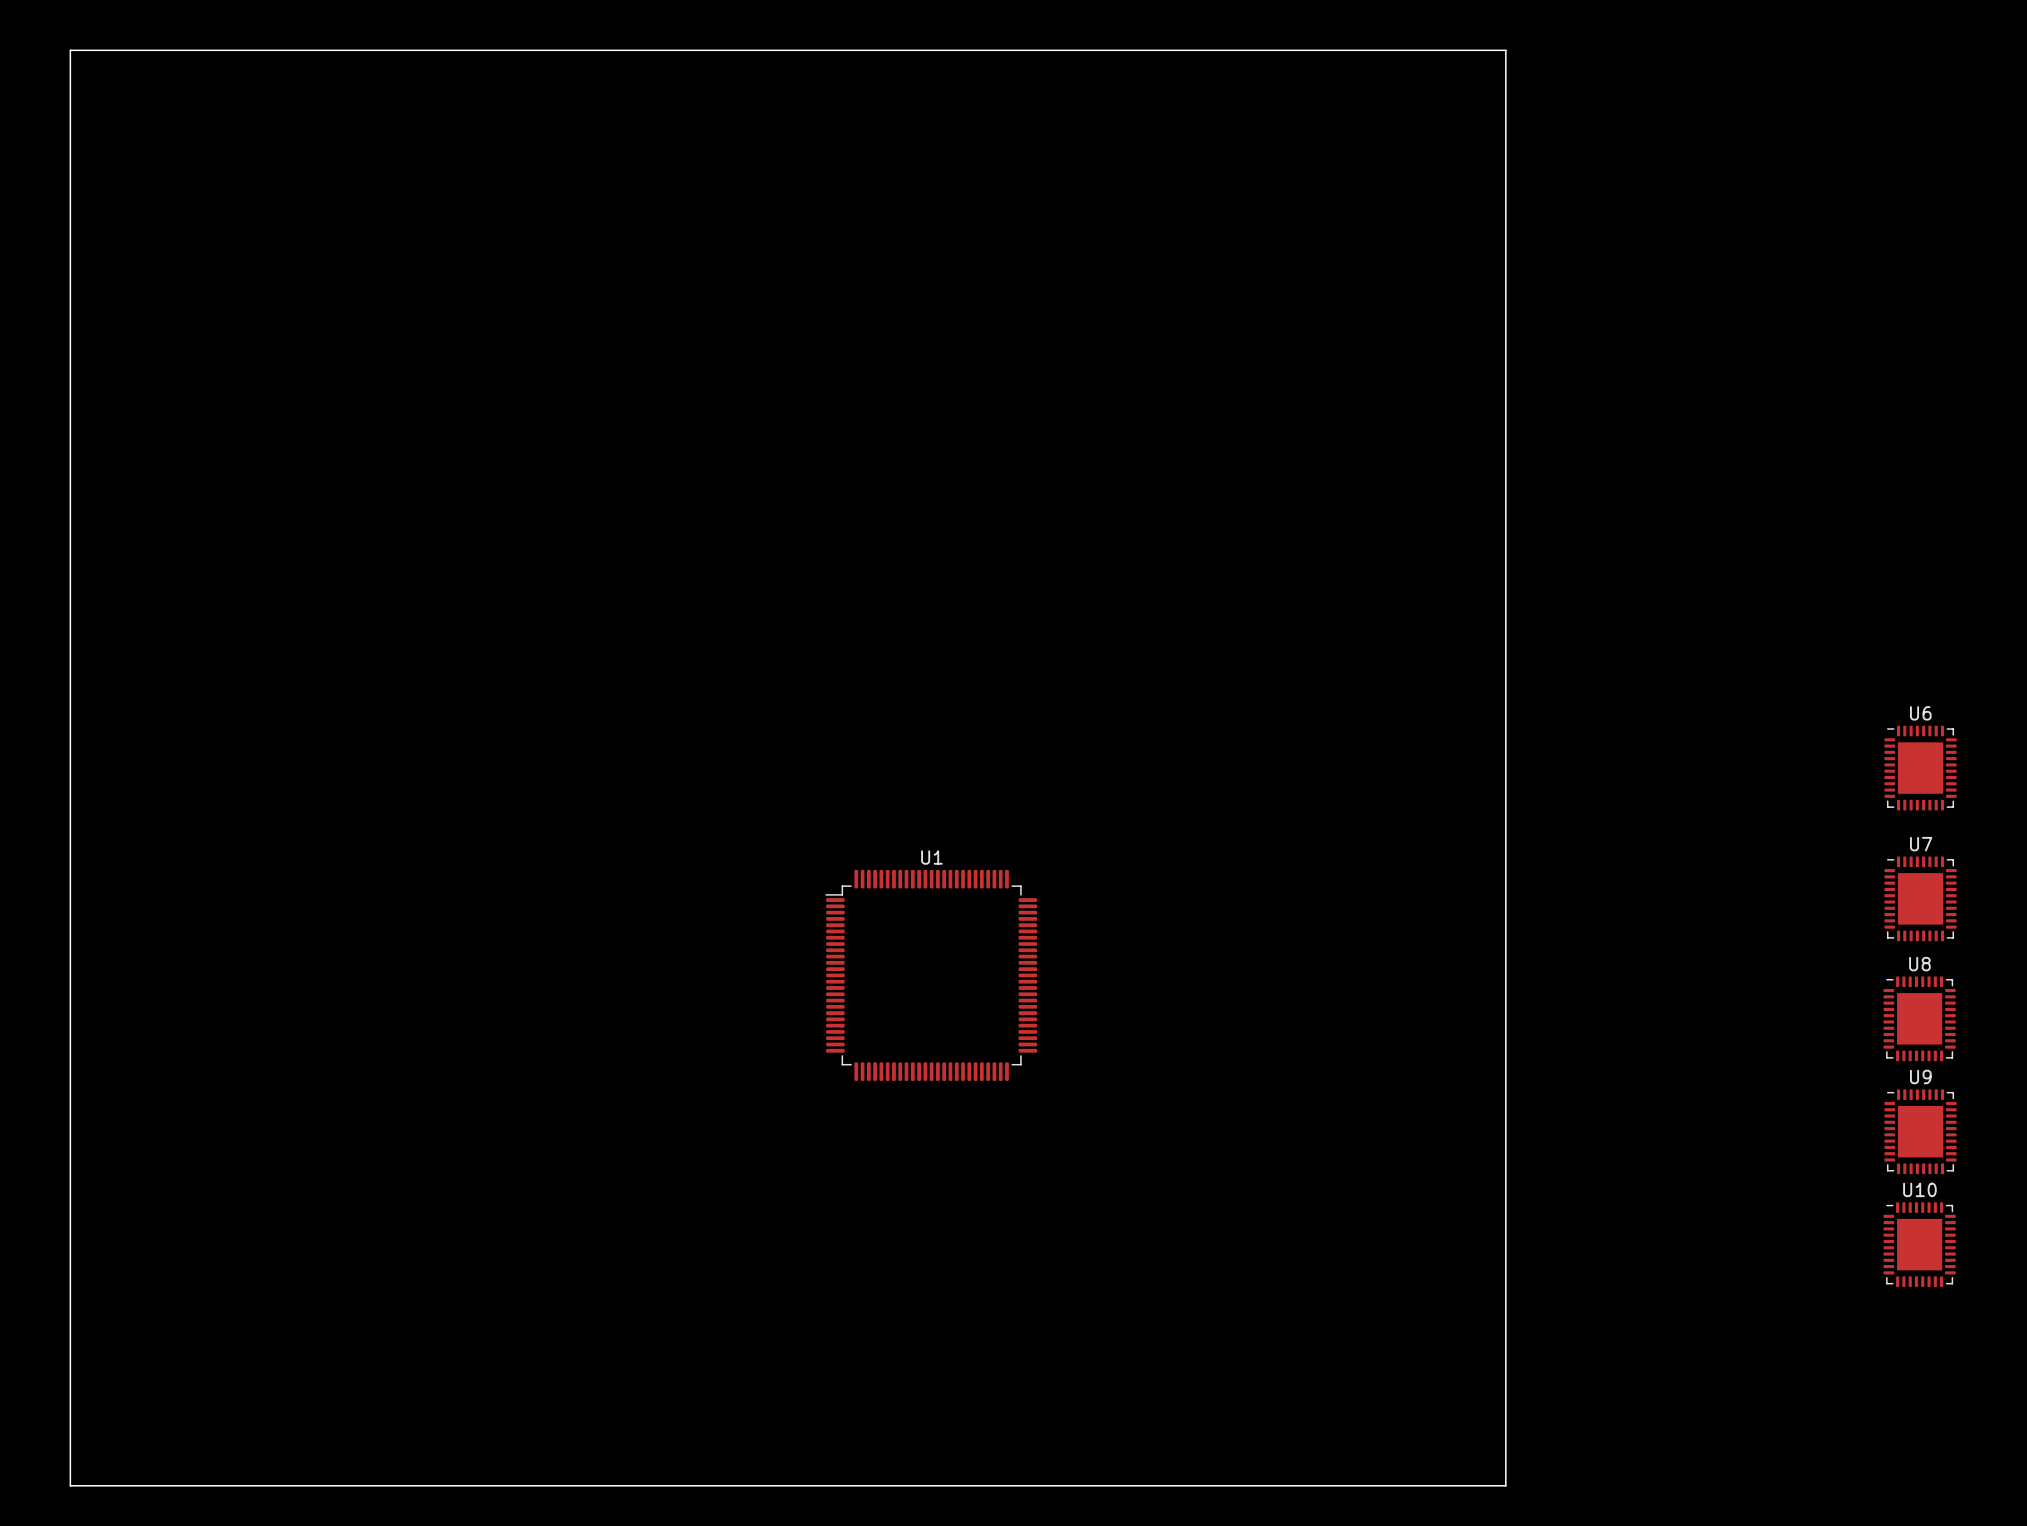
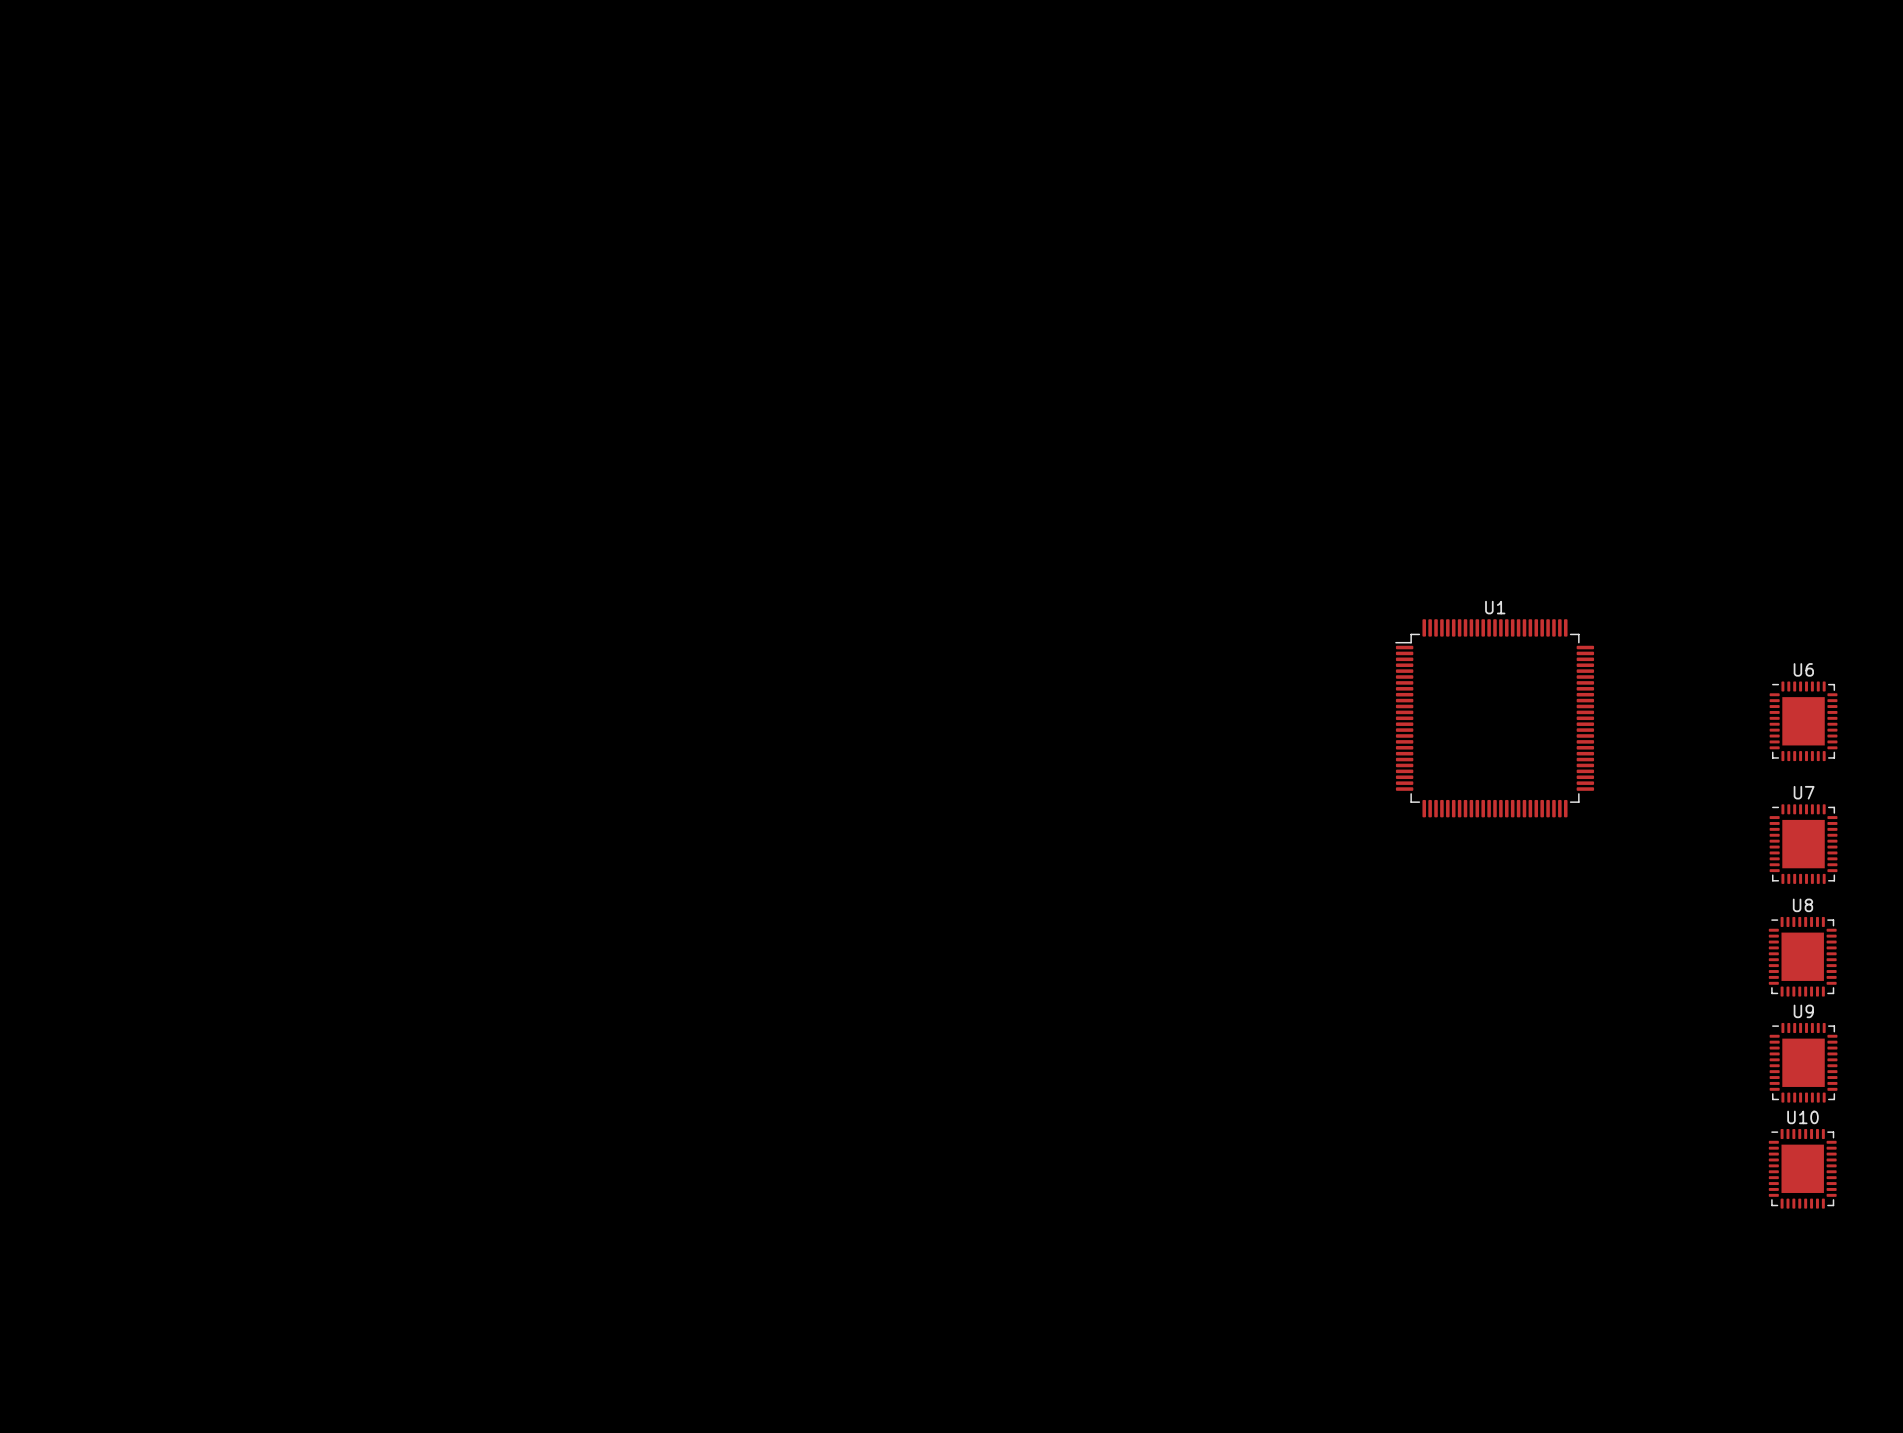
board edge: (70, 50) (1505, 50) (1505, 1485) (70, 1485) (70, 50) -> none
U1 position: (931, 975) -> (1494, 718)

